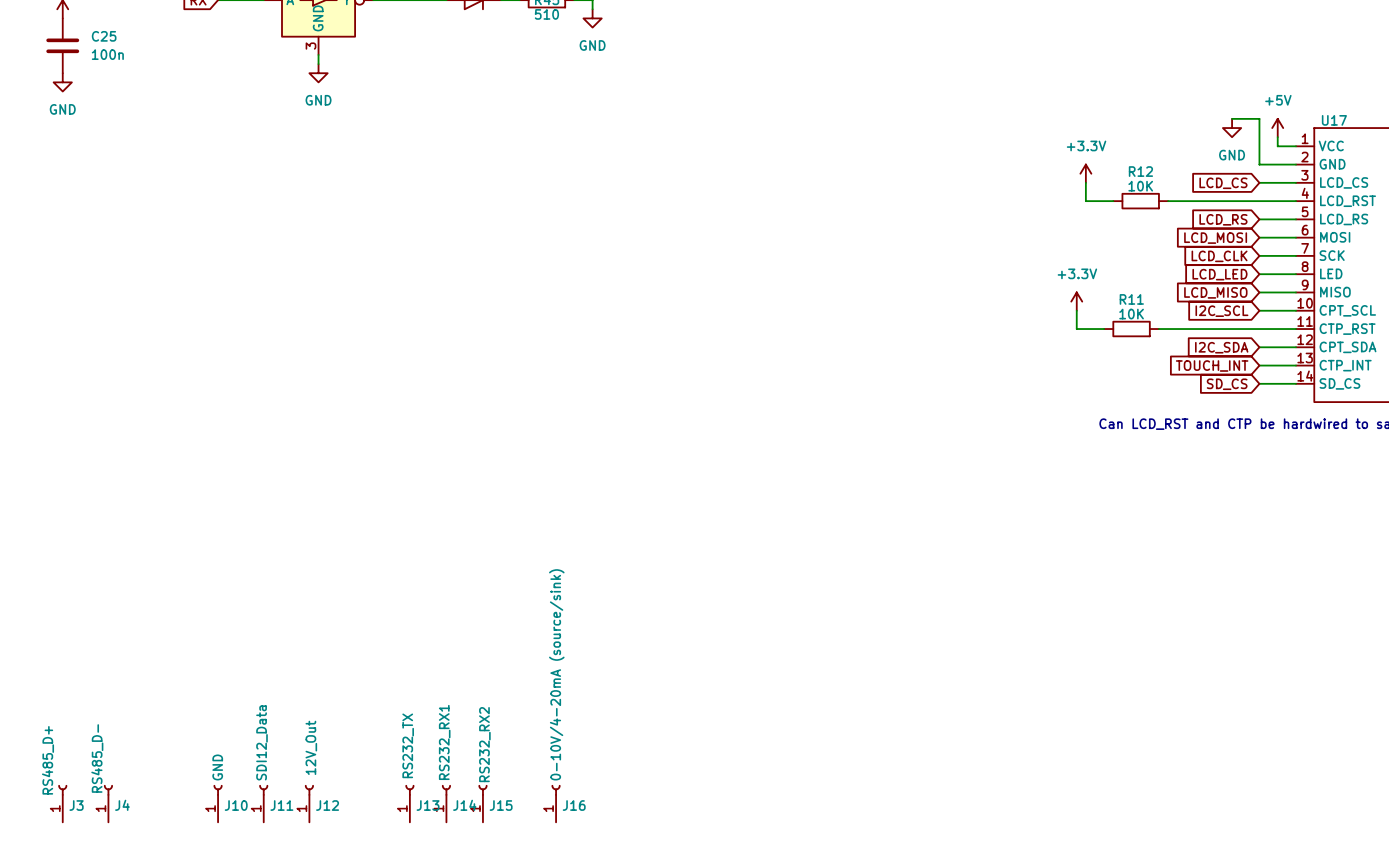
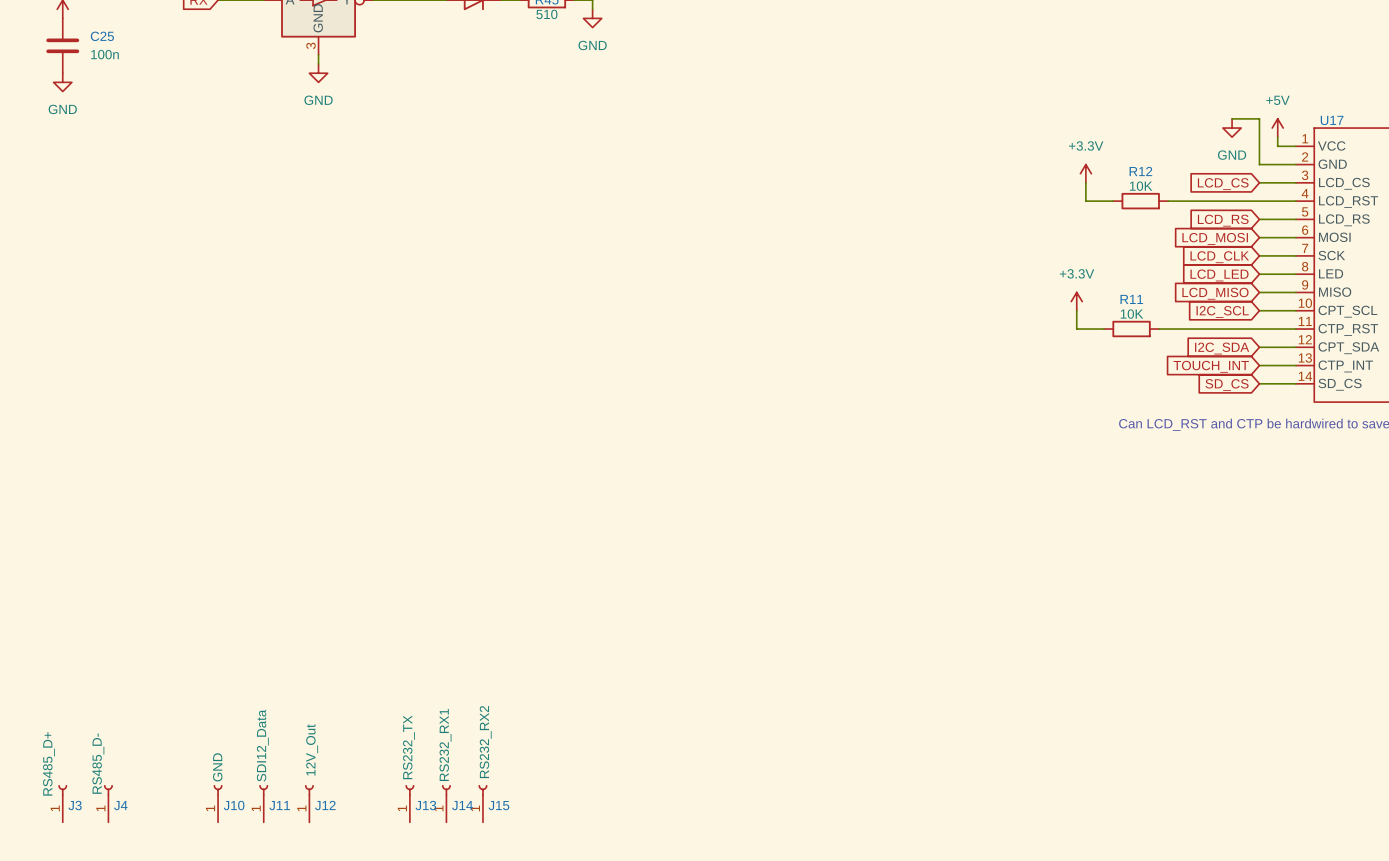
J16: 0-10V/4-20mA (source/sink) (556, 803) -> none

